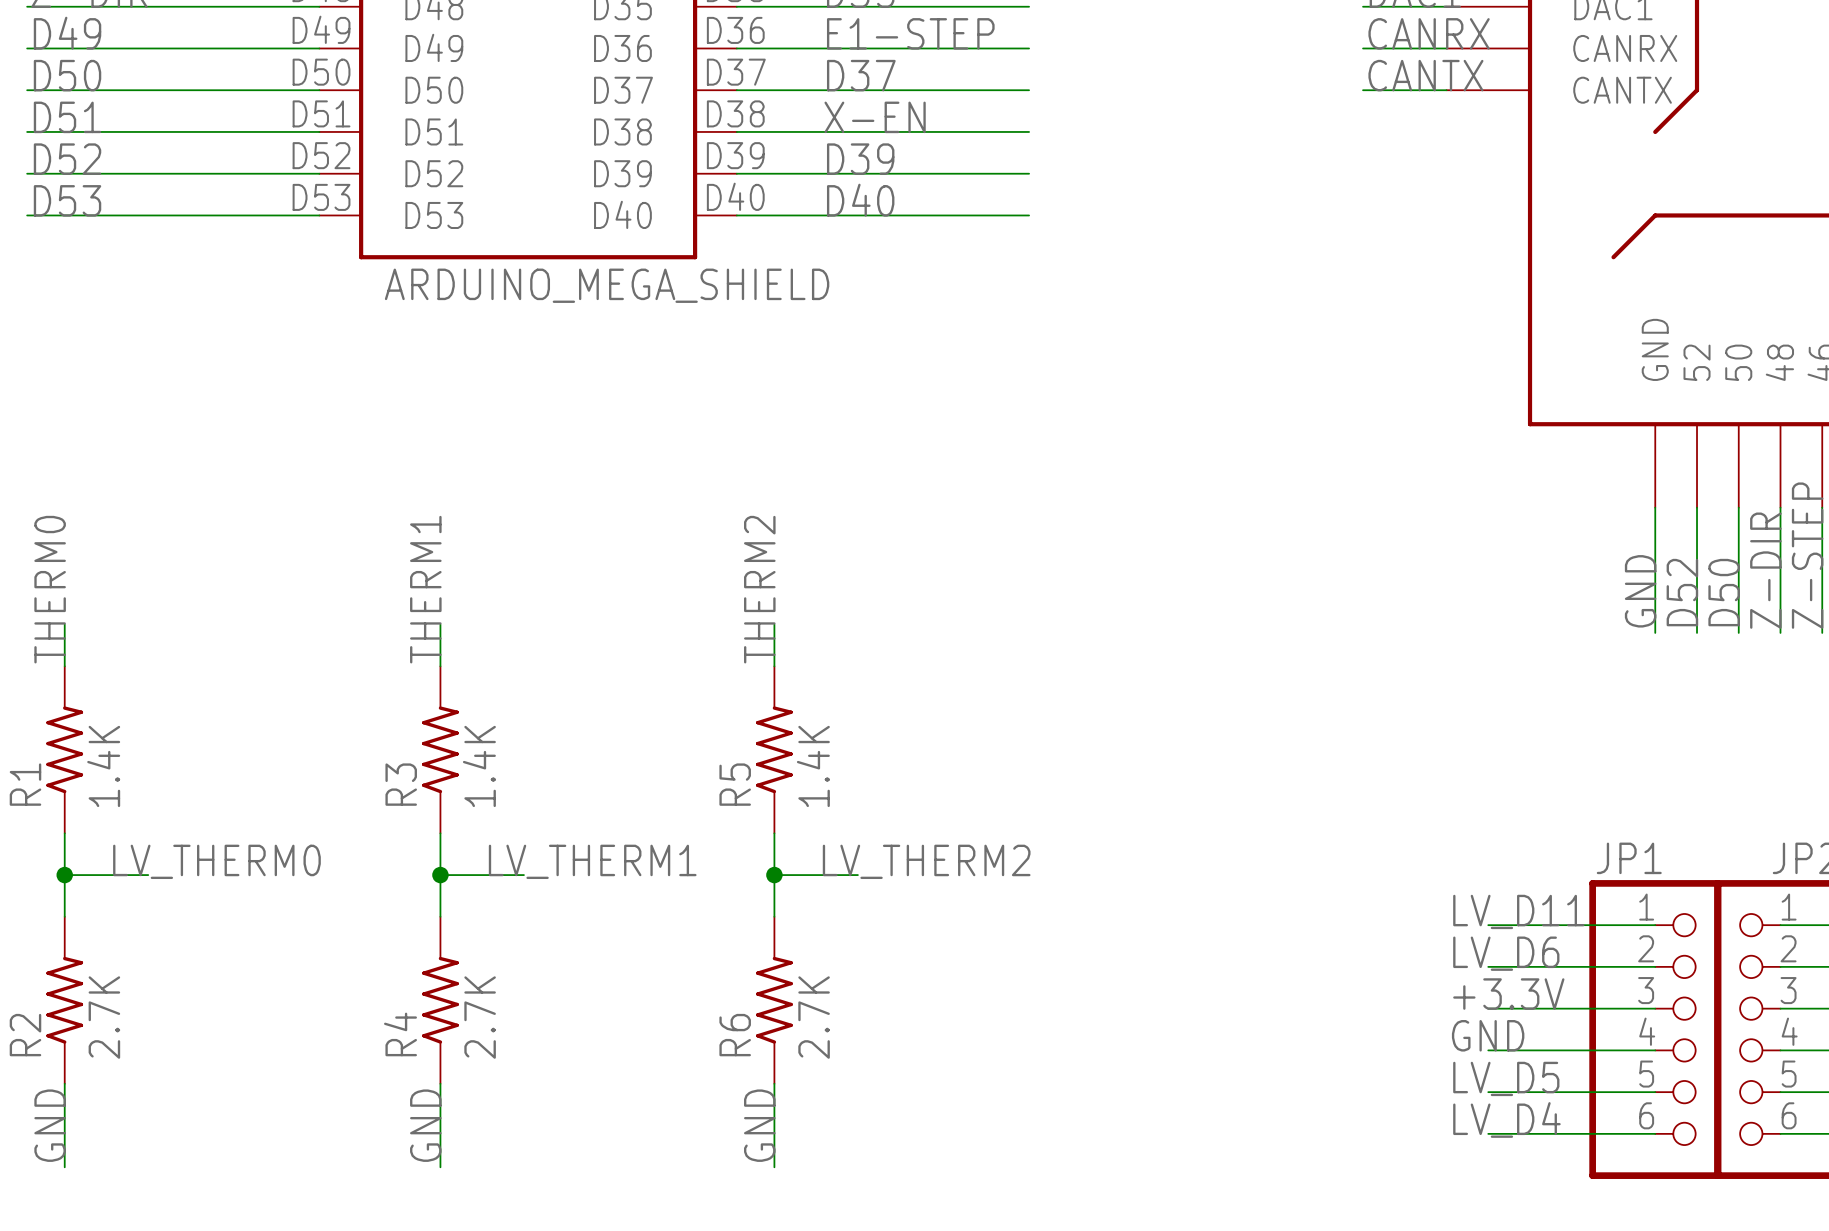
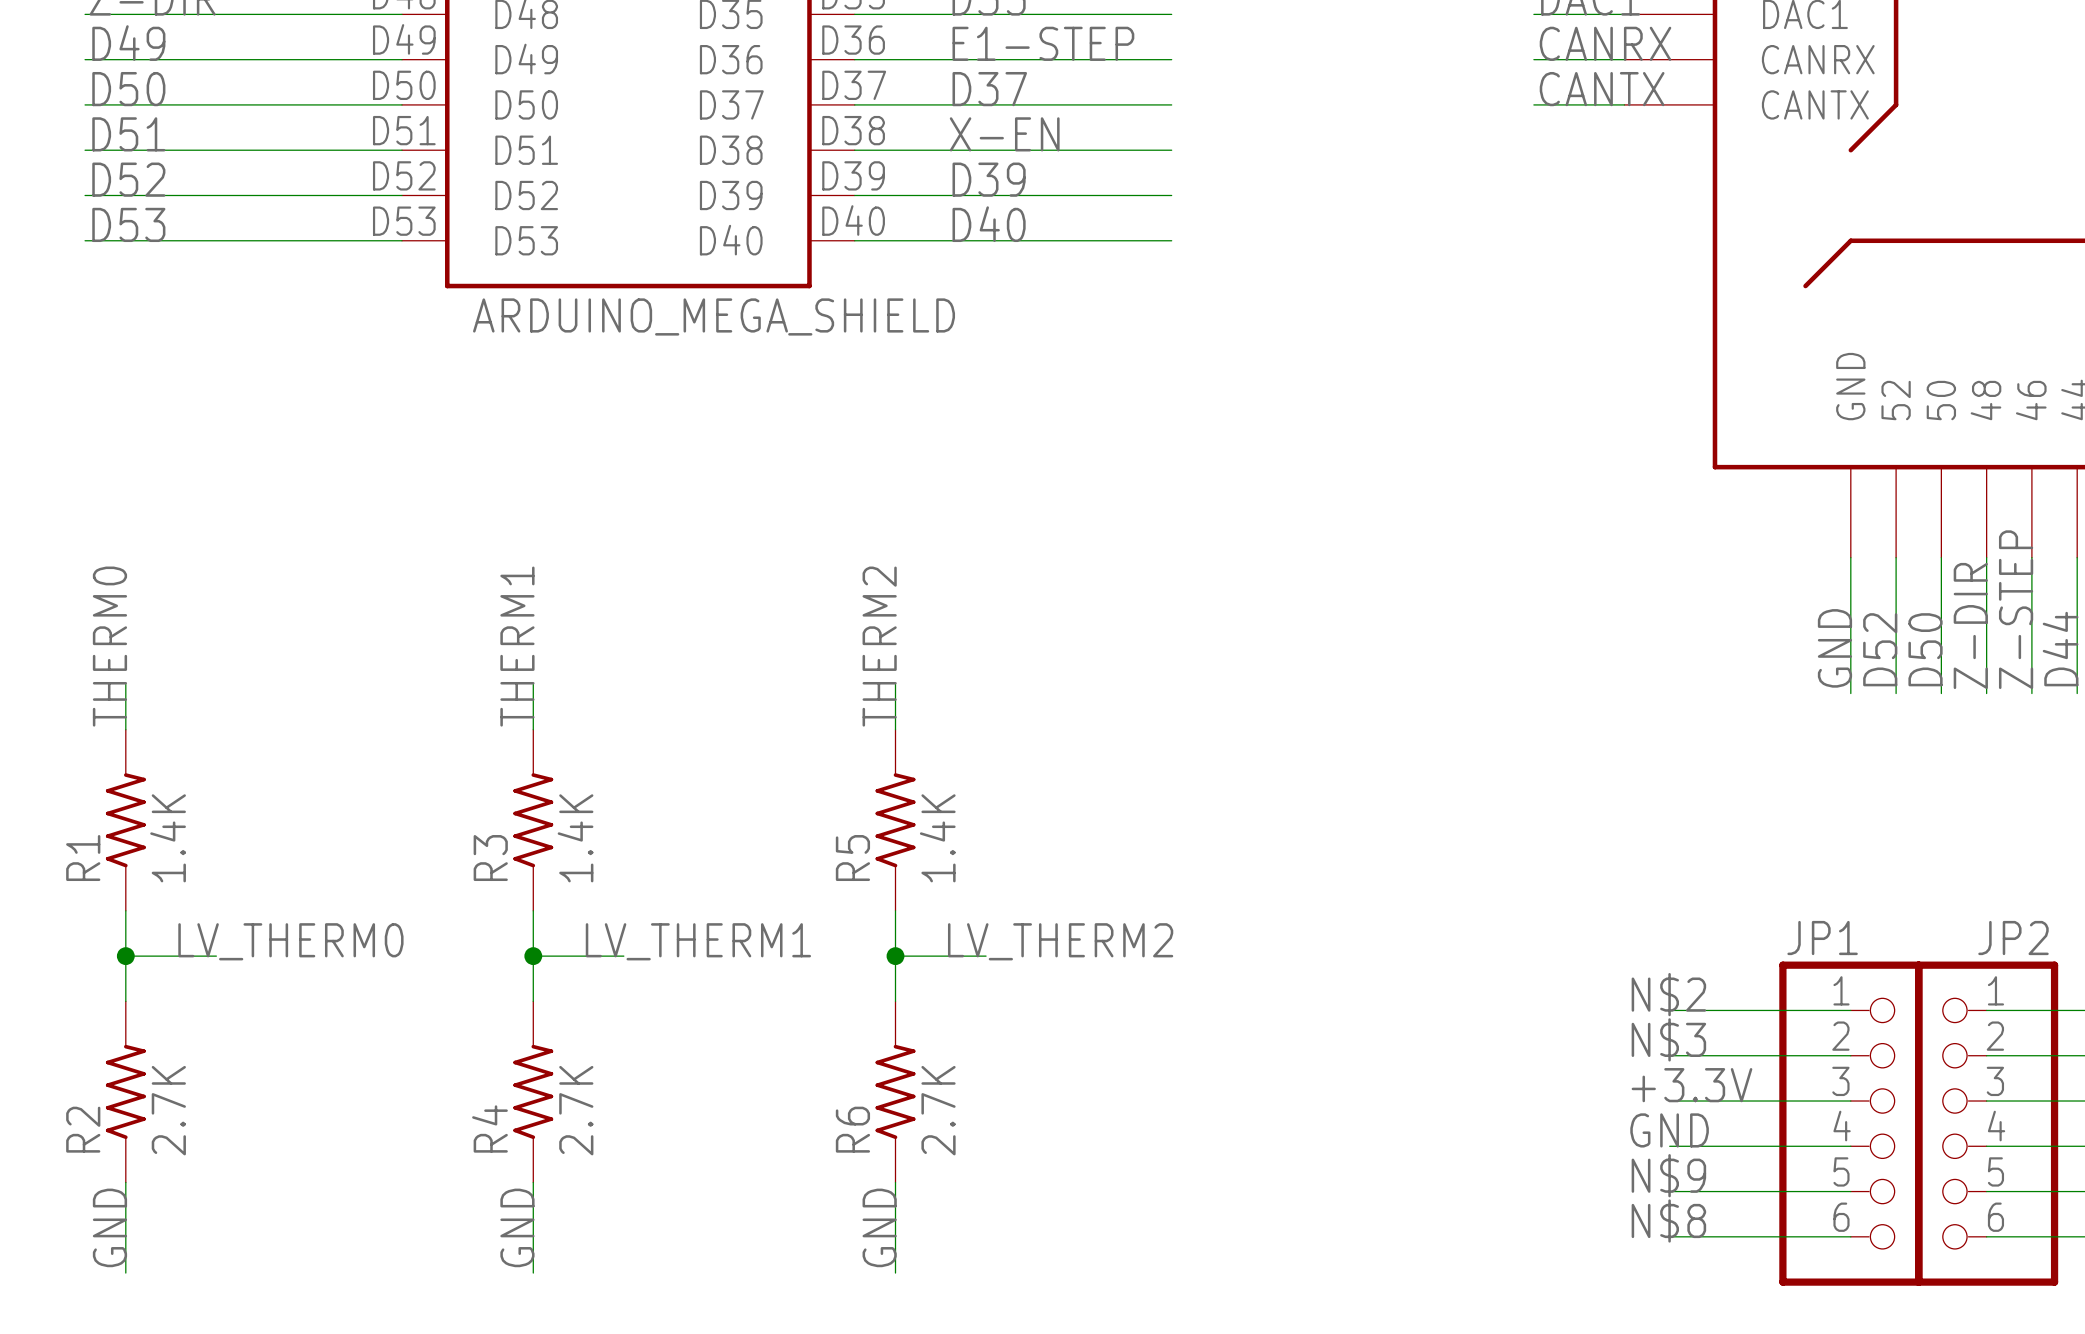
label: LV_D11 (1518, 911) -> N$2 (1668, 994)
label: LV_D6 (1506, 953) -> N$3 (1668, 1039)
label: LV_D5 (1506, 1078) -> N$9 (1668, 1175)
label: LV_D4 (1506, 1119) -> N$8 (1668, 1220)

